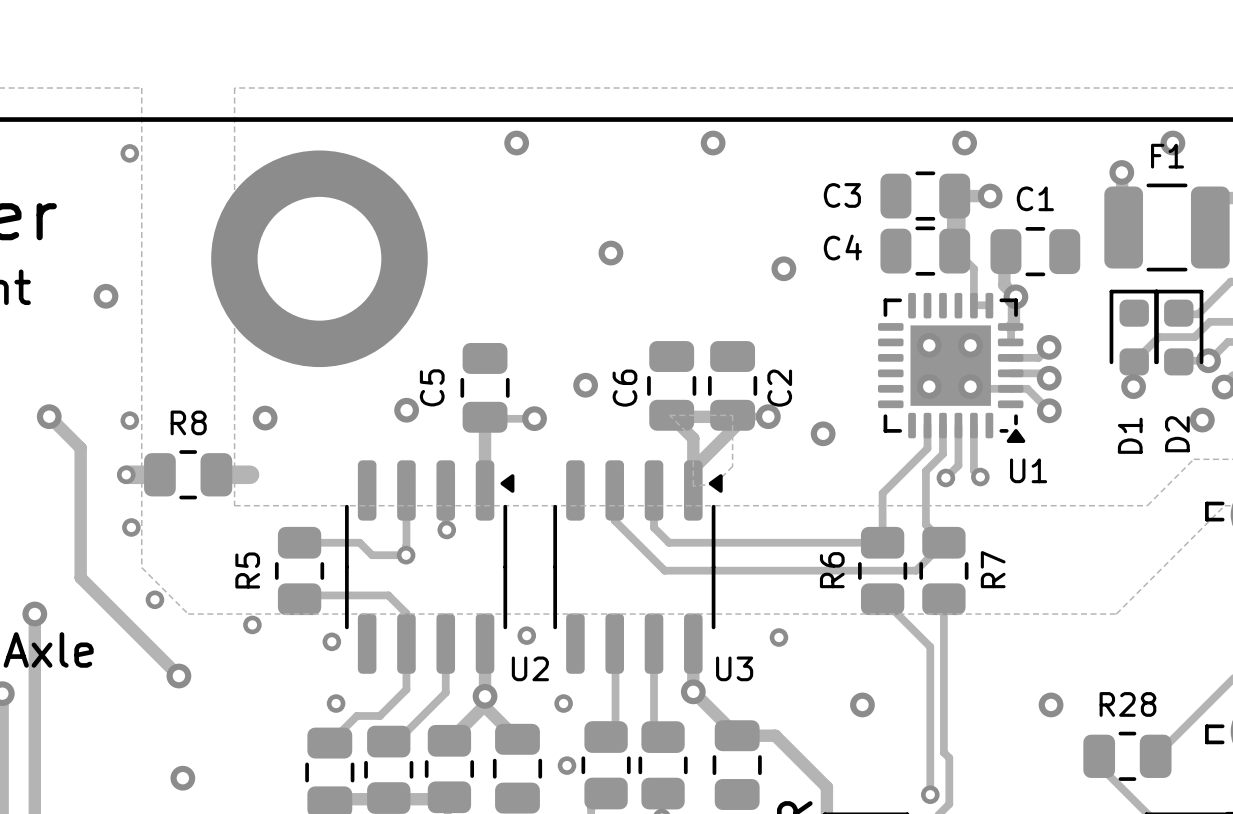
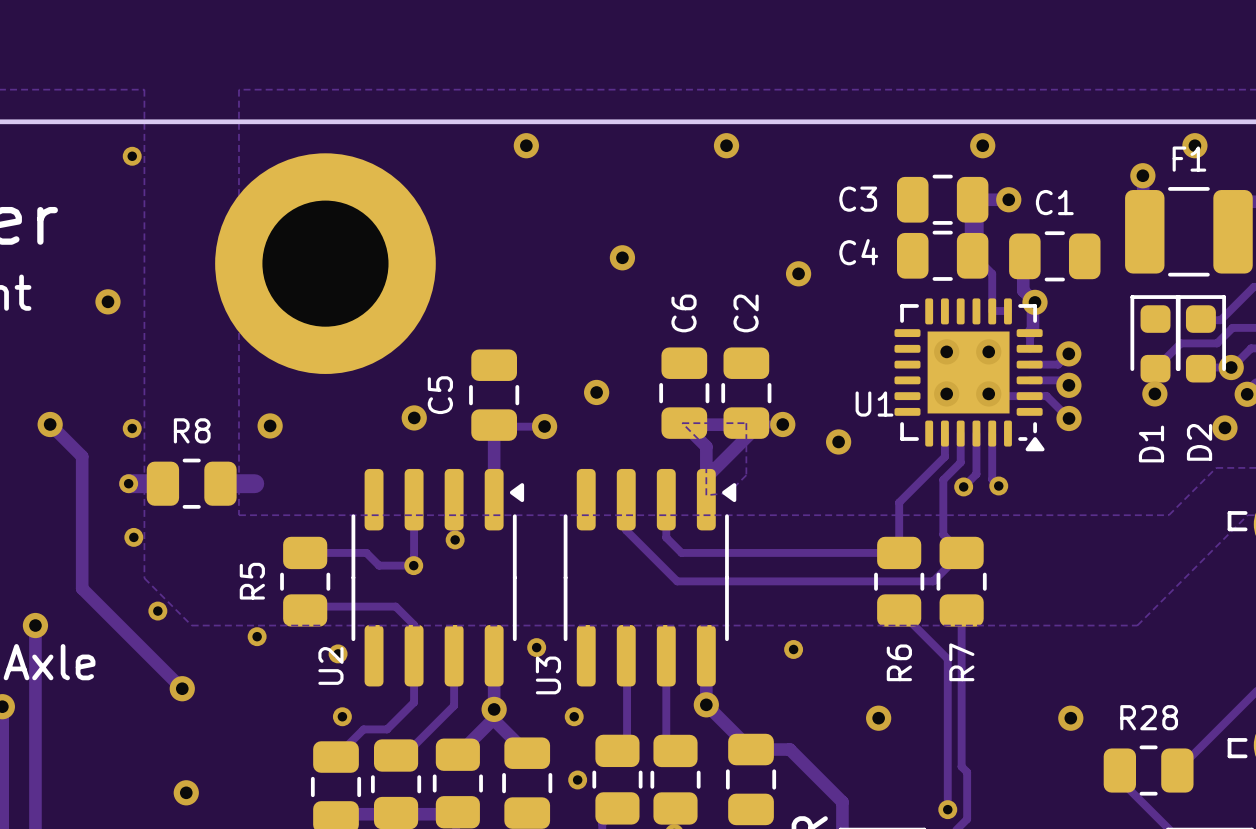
C6 name position: C6 (624, 388) -> C6 (684, 313)
C2 name position: C2 (779, 388) -> C2 (746, 313)
U1 name position: U1 (1028, 470) -> U1 (874, 404)
R7 name position: R7 (993, 569) -> R7 (961, 662)
R6 name position: R6 (832, 570) -> R6 (899, 662)
U2 name rotation: 0° (530, 668) -> 90° counterclockwise (330, 665)
U2 name position: U2 (530, 668) -> U2 (330, 665)
U3 name rotation: 0° (734, 668) -> 90° counterclockwise (548, 675)
U3 name position: U3 (734, 668) -> U3 (548, 675)

